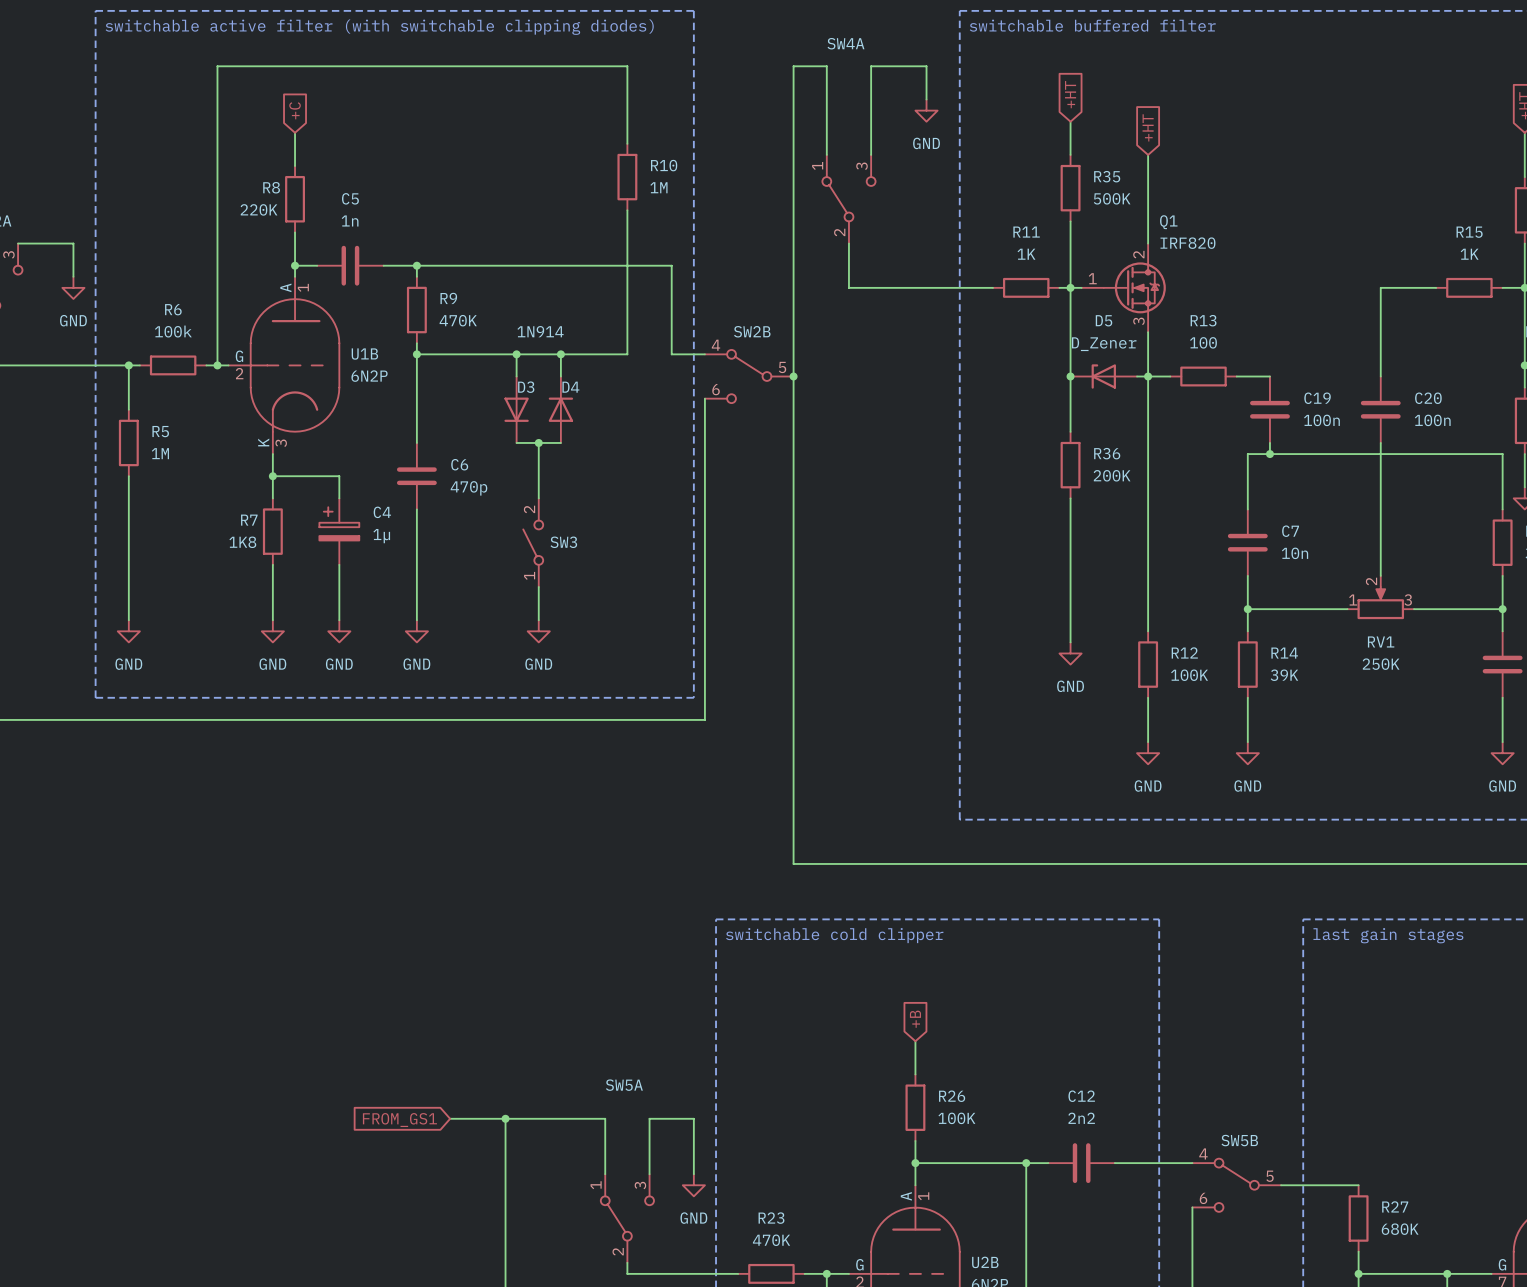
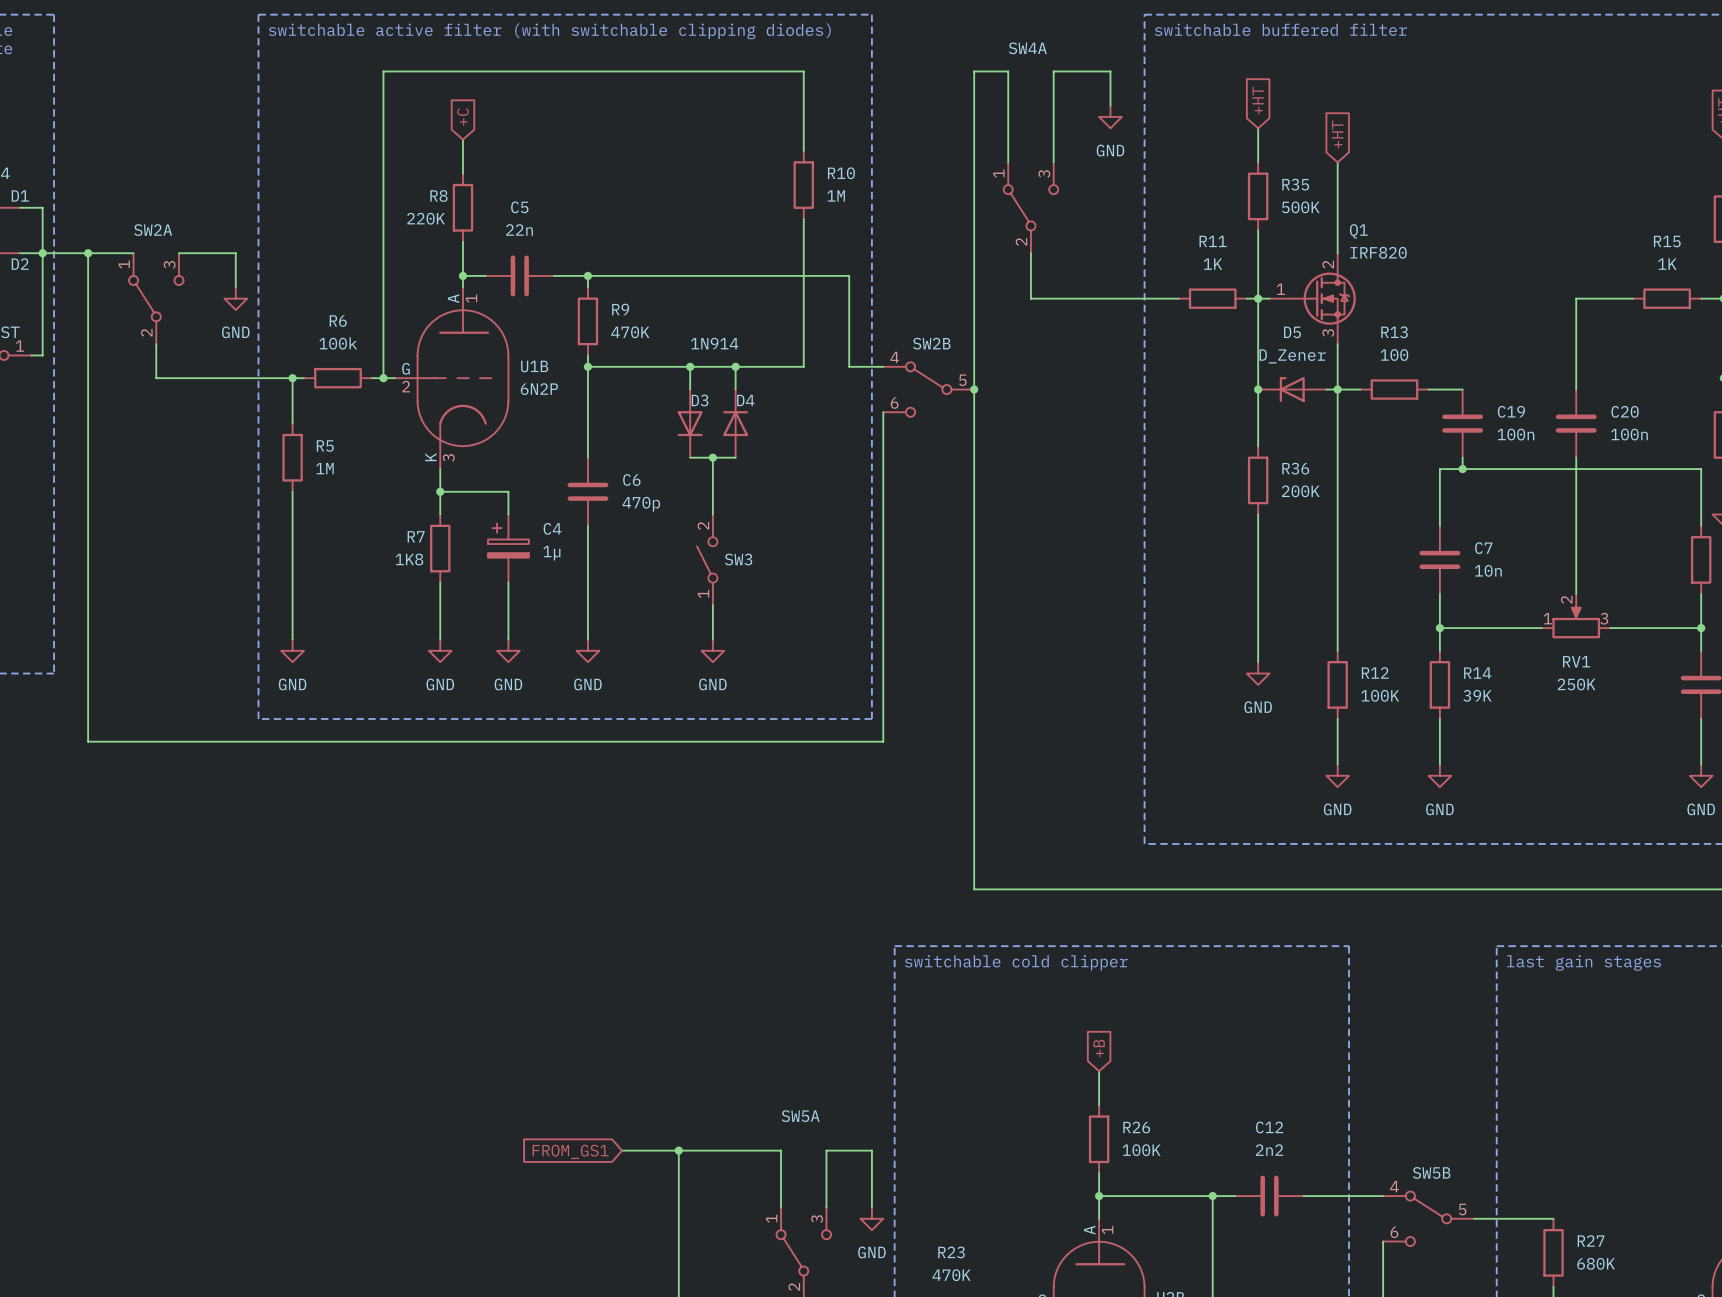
C5 value: 1n (350, 220) -> 22n (519, 229)

